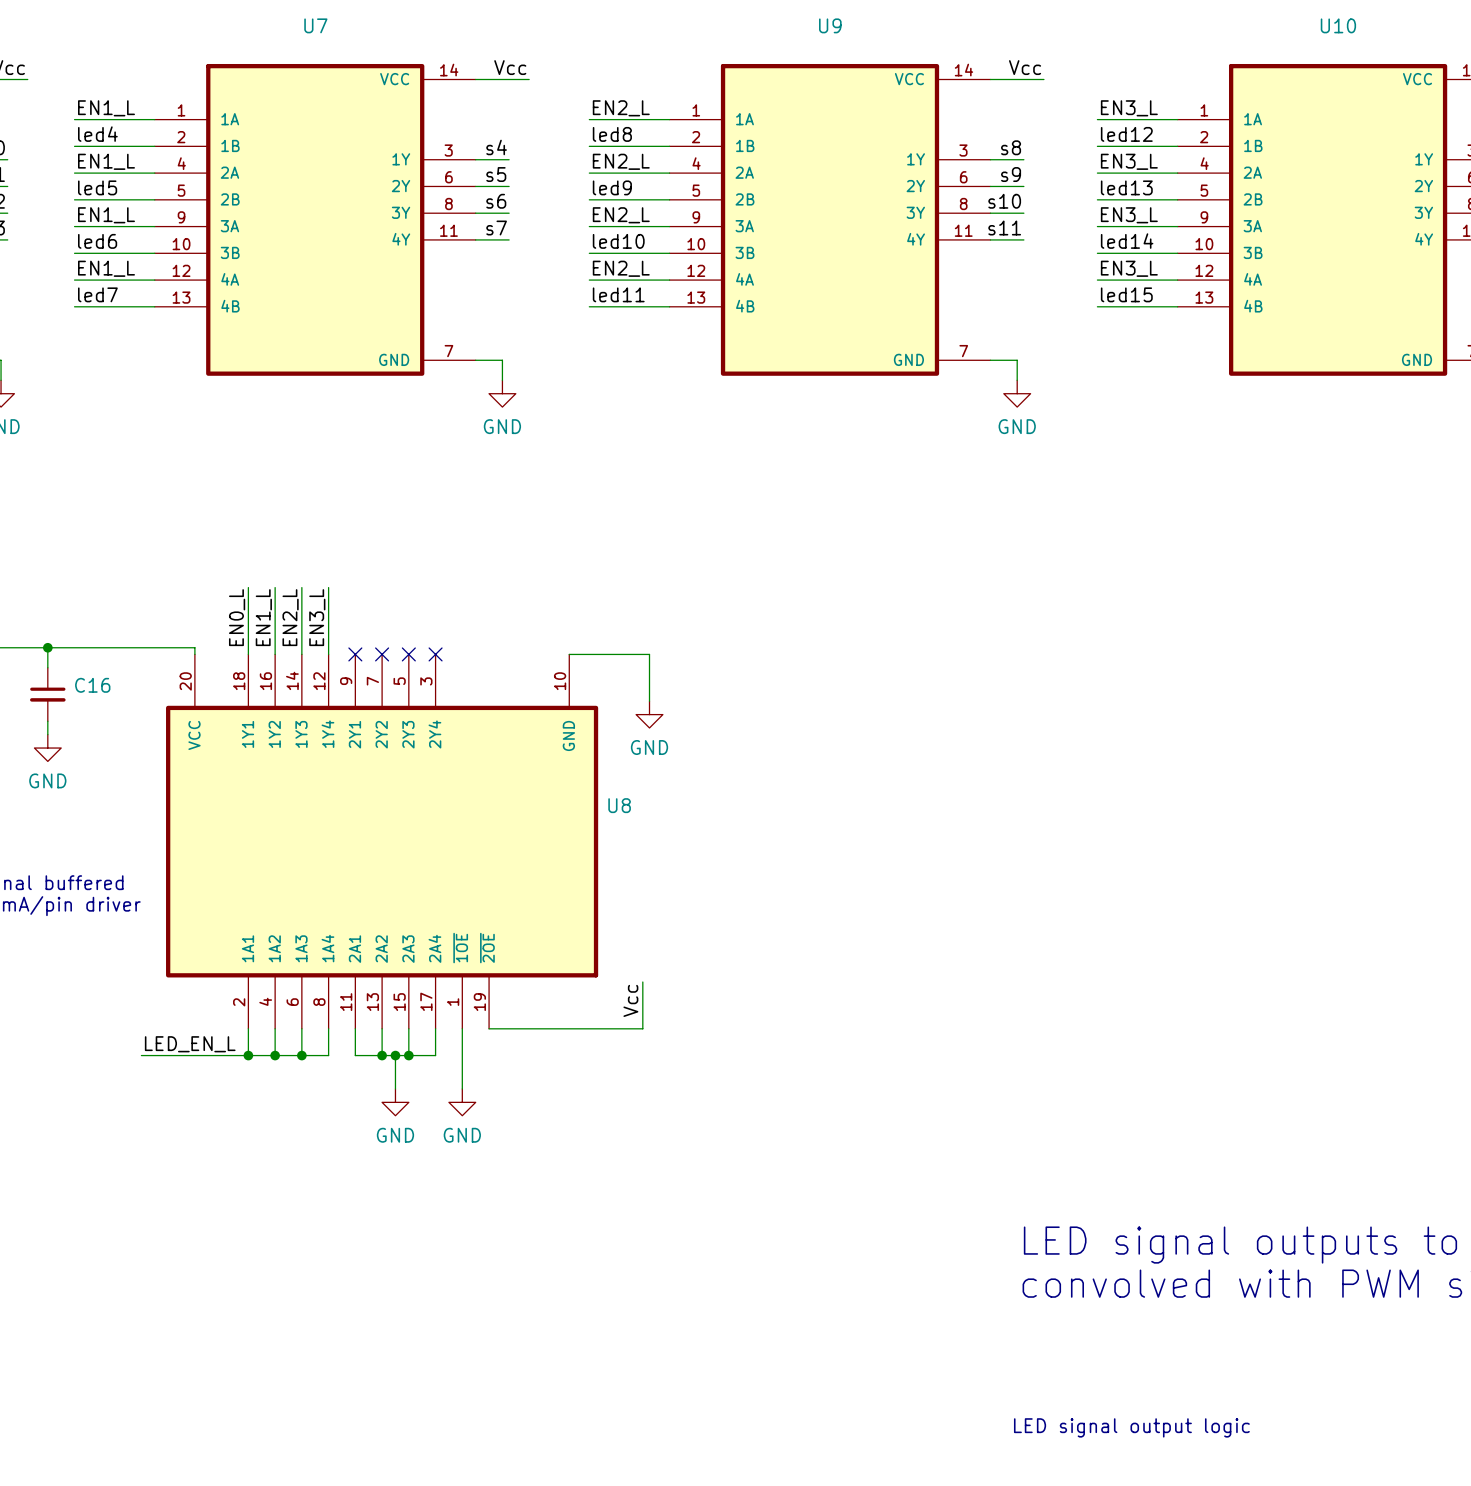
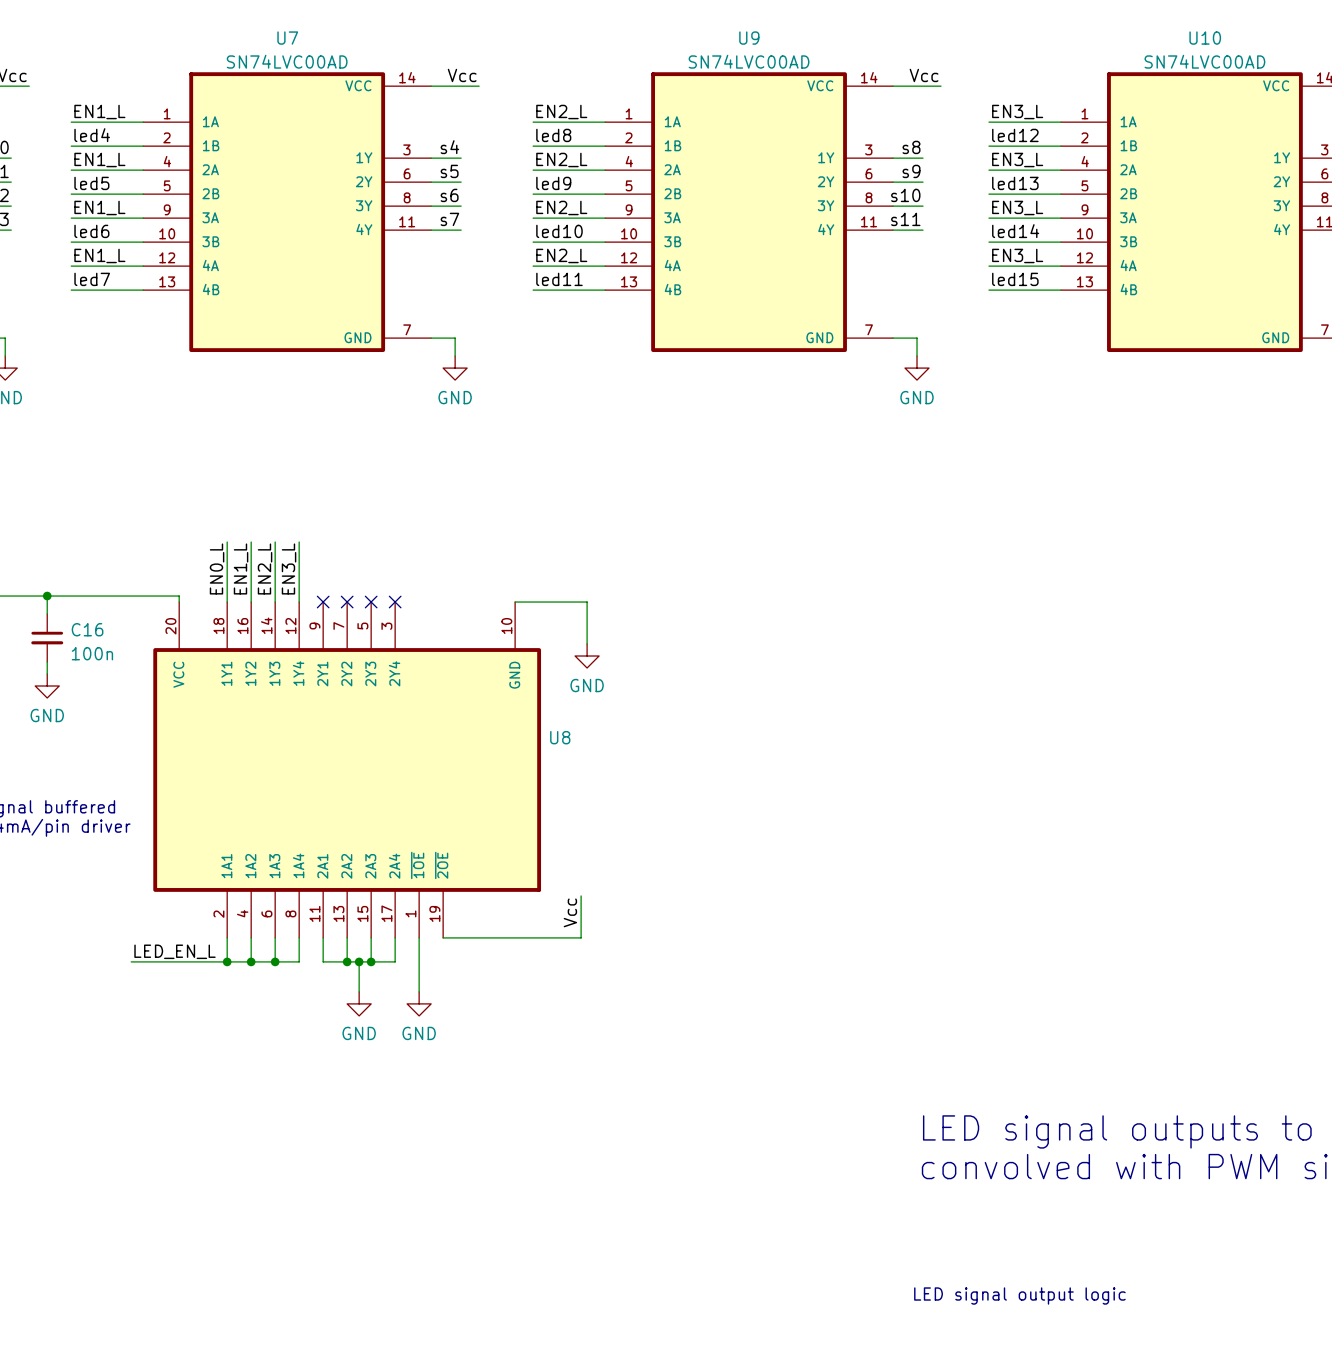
U7 value: none -> SN74LVC00AD (287, 61)
U9 value: none -> SN74LVC00AD (749, 61)
U10 value: none -> SN74LVC00AD (1204, 61)
C16 value: none -> 100n (92, 653)

